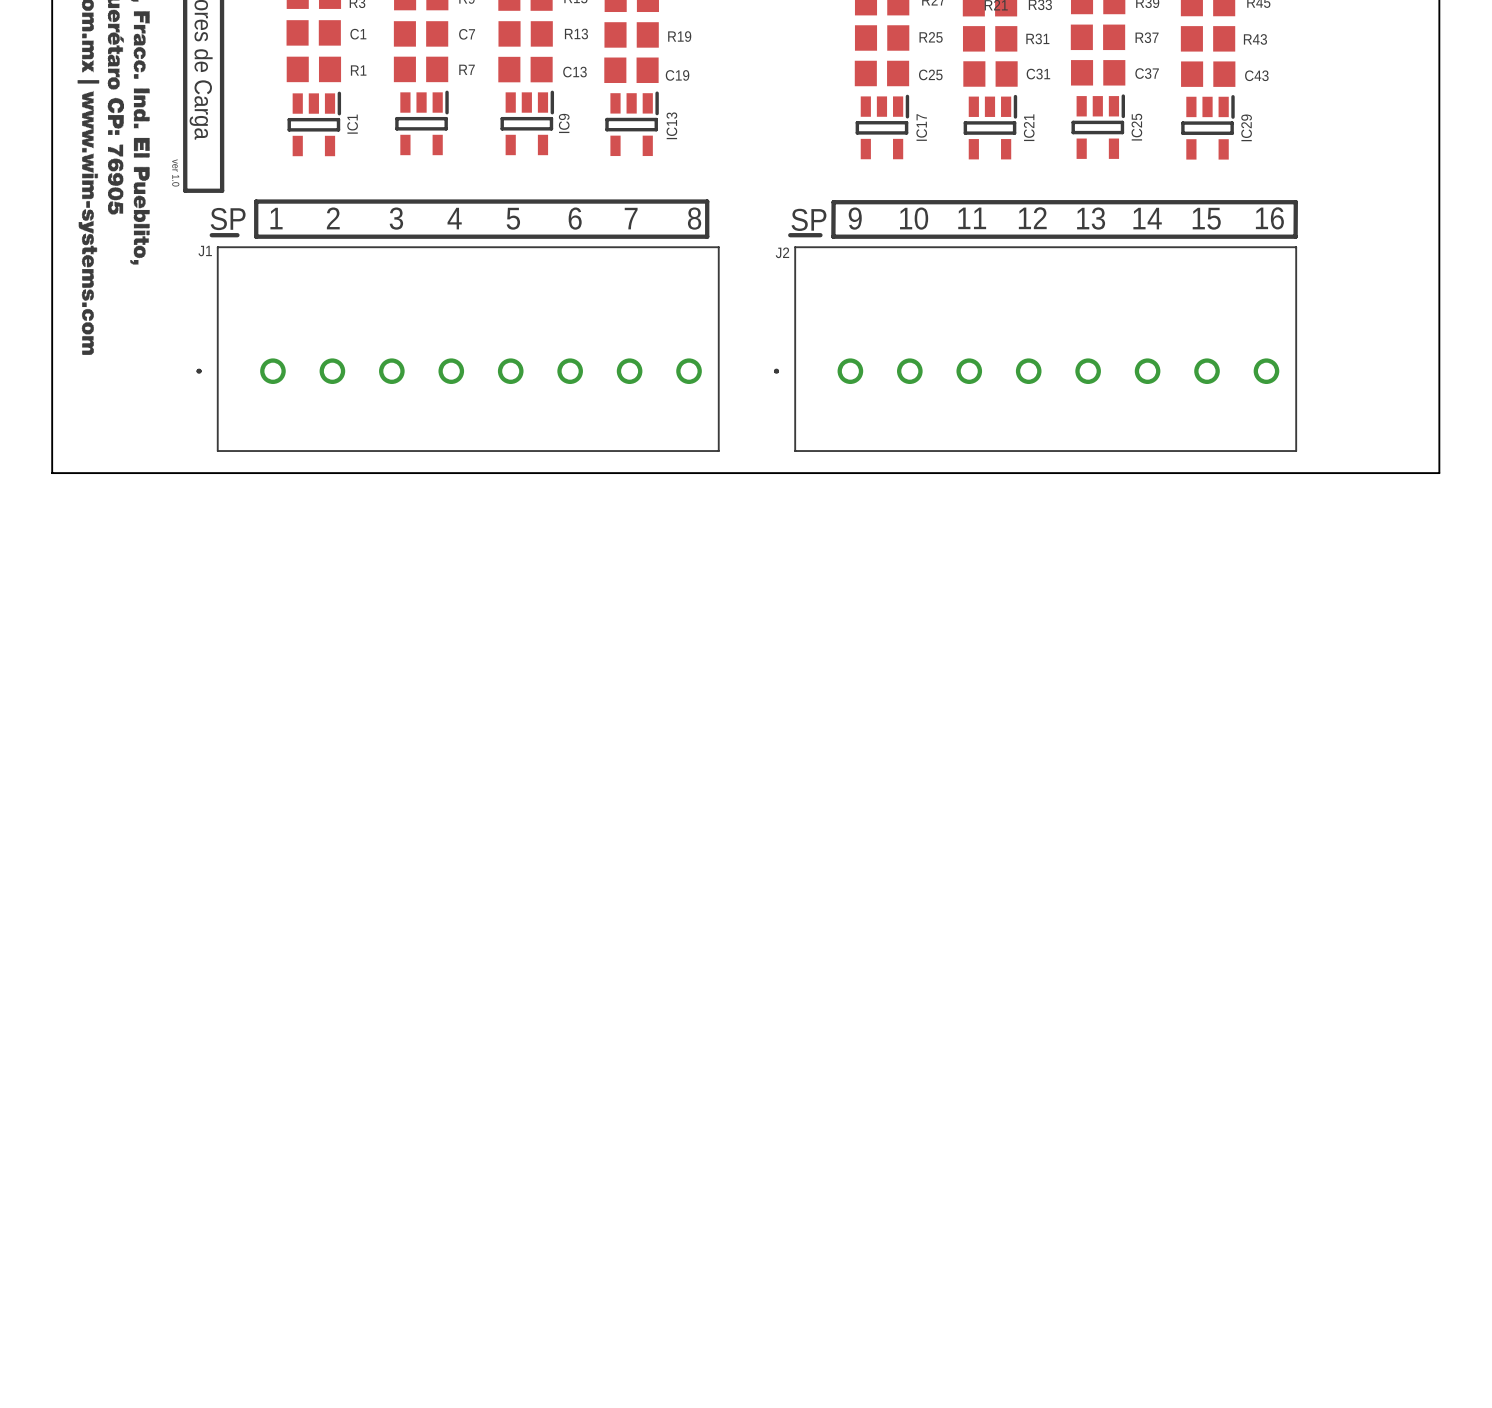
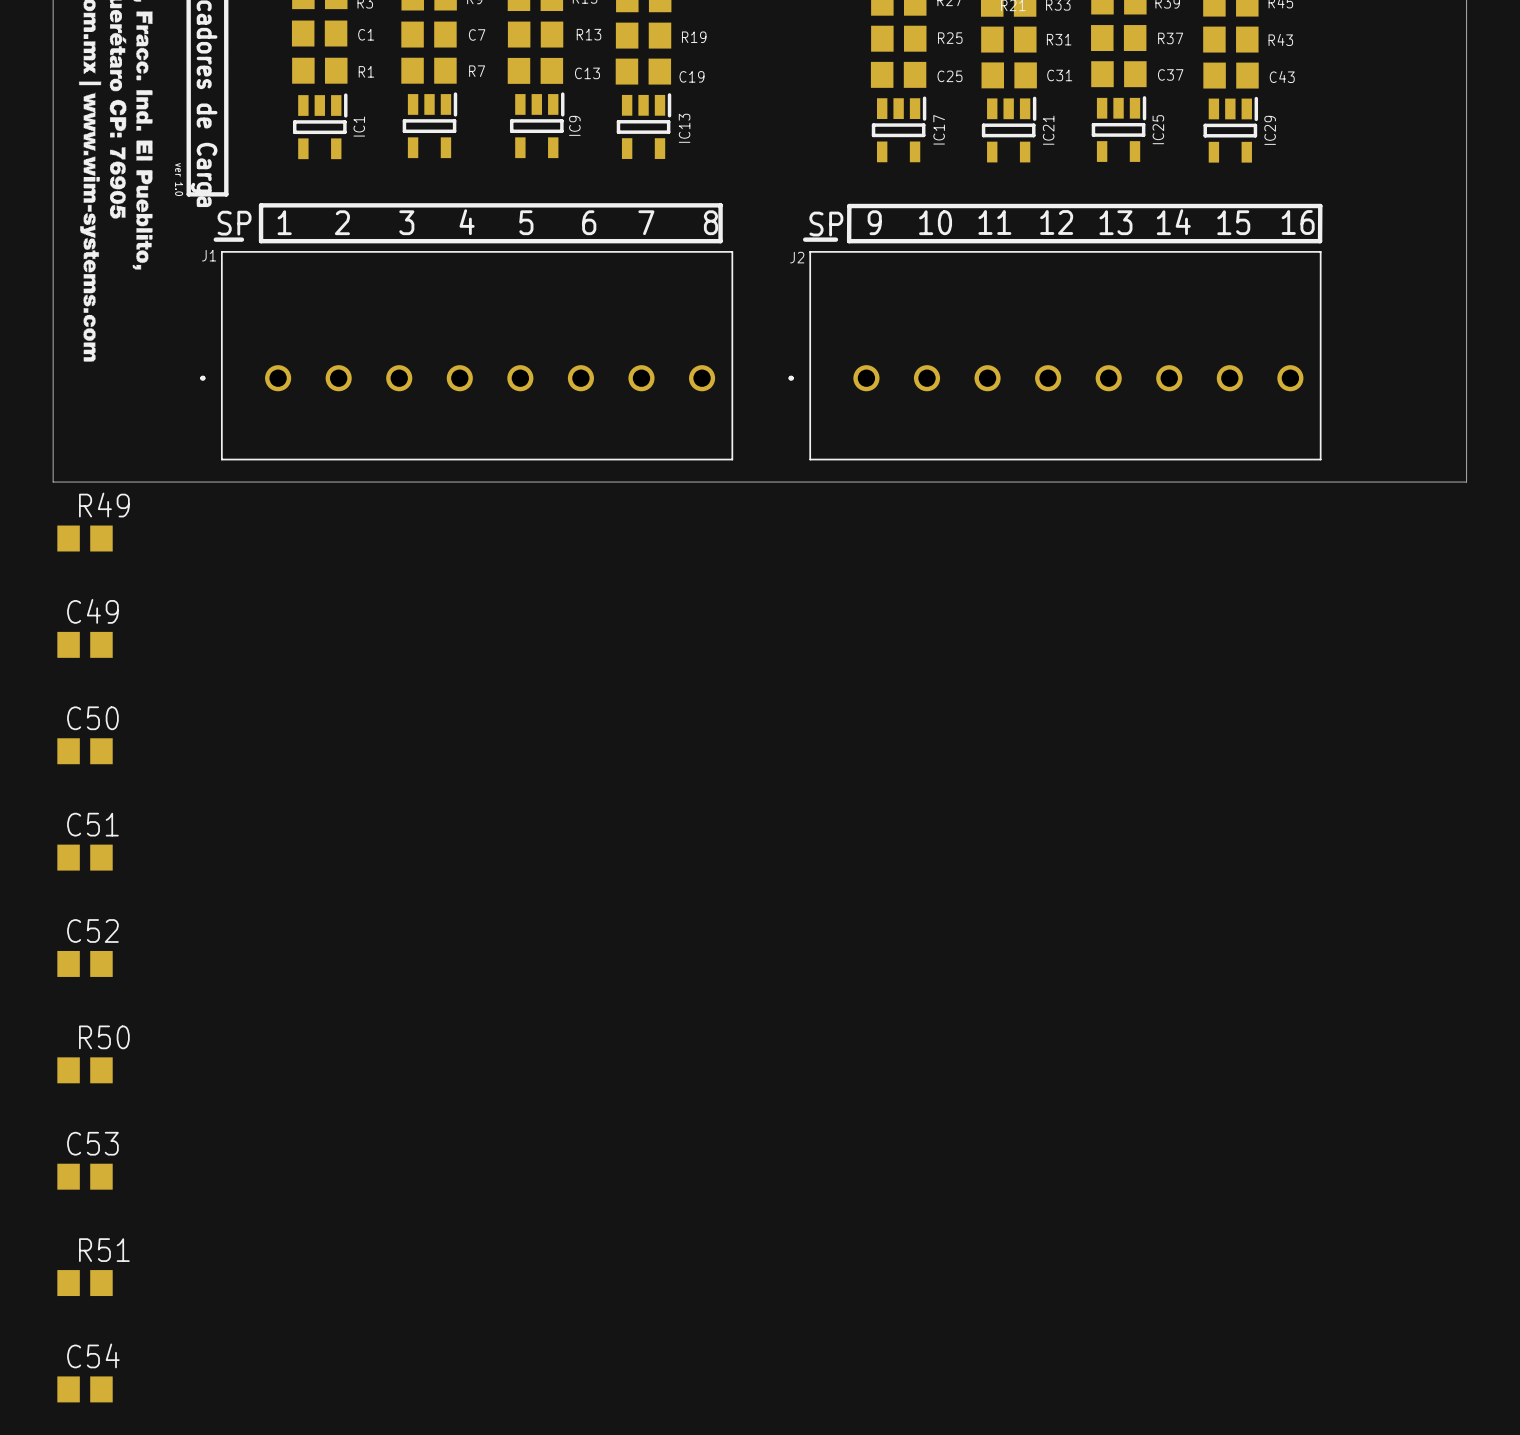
R49: none -> (85, 538)
C49: none -> (85, 644)
C50: none -> (85, 751)
C51: none -> (85, 857)
C52: none -> (85, 963)
R50: none -> (85, 1070)
C53: none -> (85, 1176)
R51: none -> (85, 1283)
C54: none -> (85, 1389)

